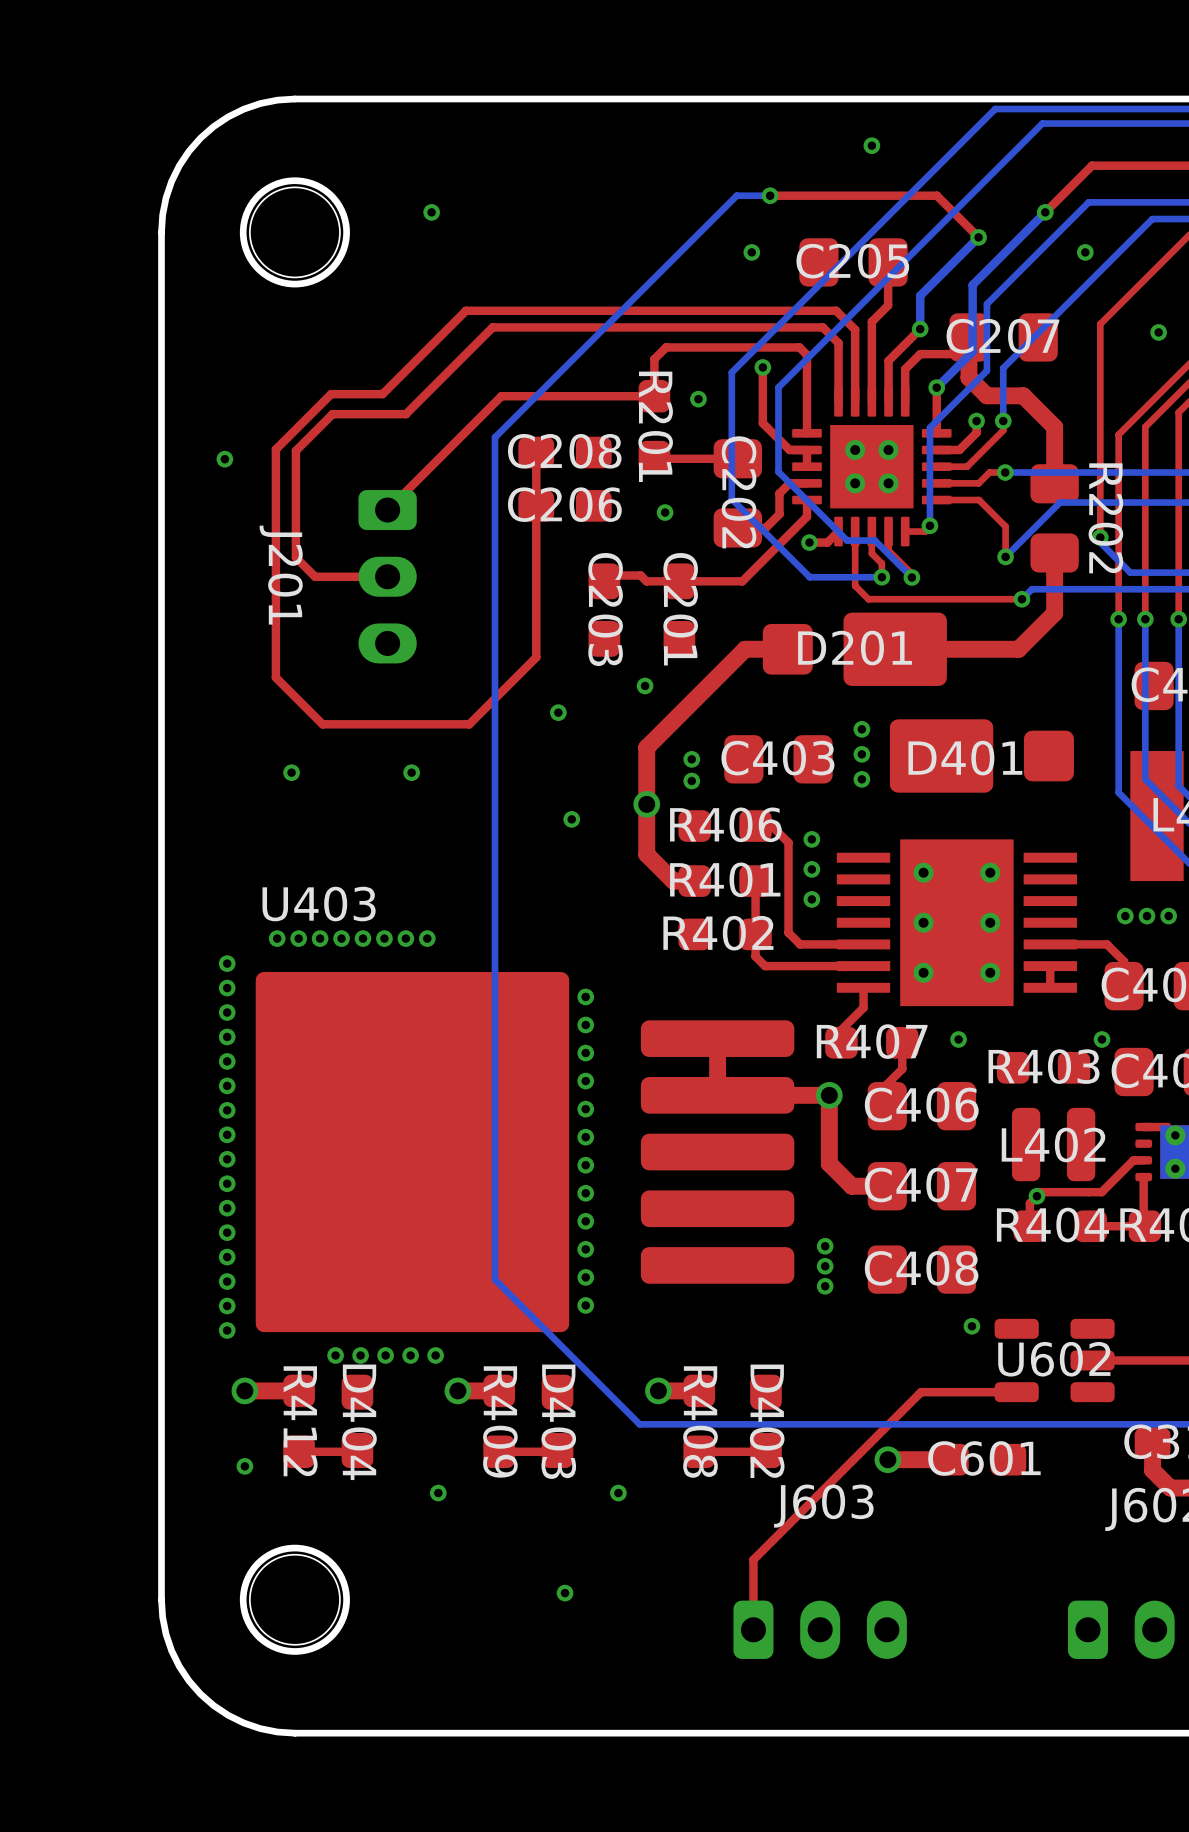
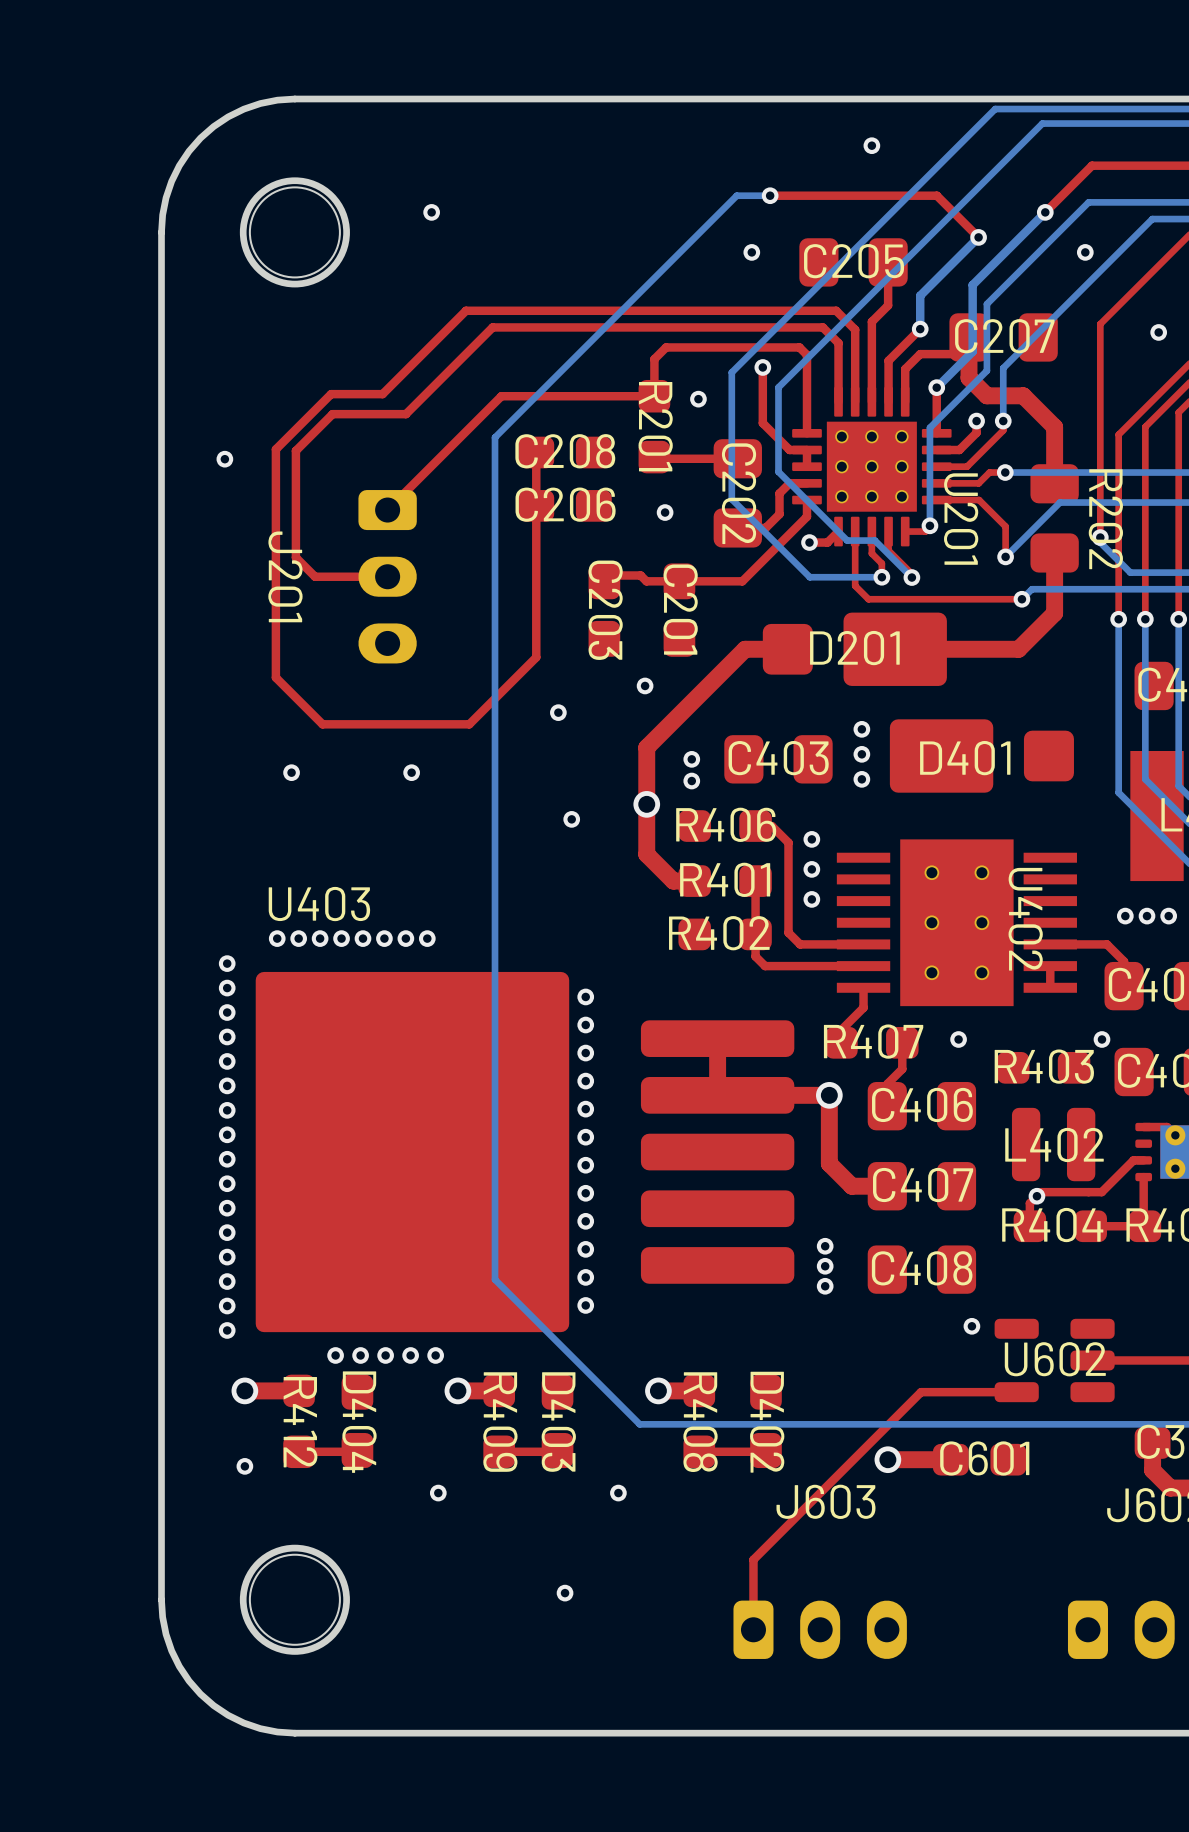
part: (871, 466) -> none
U201: none -> (871, 466)
part: (956, 922) -> none
U402: none -> (956, 922)

